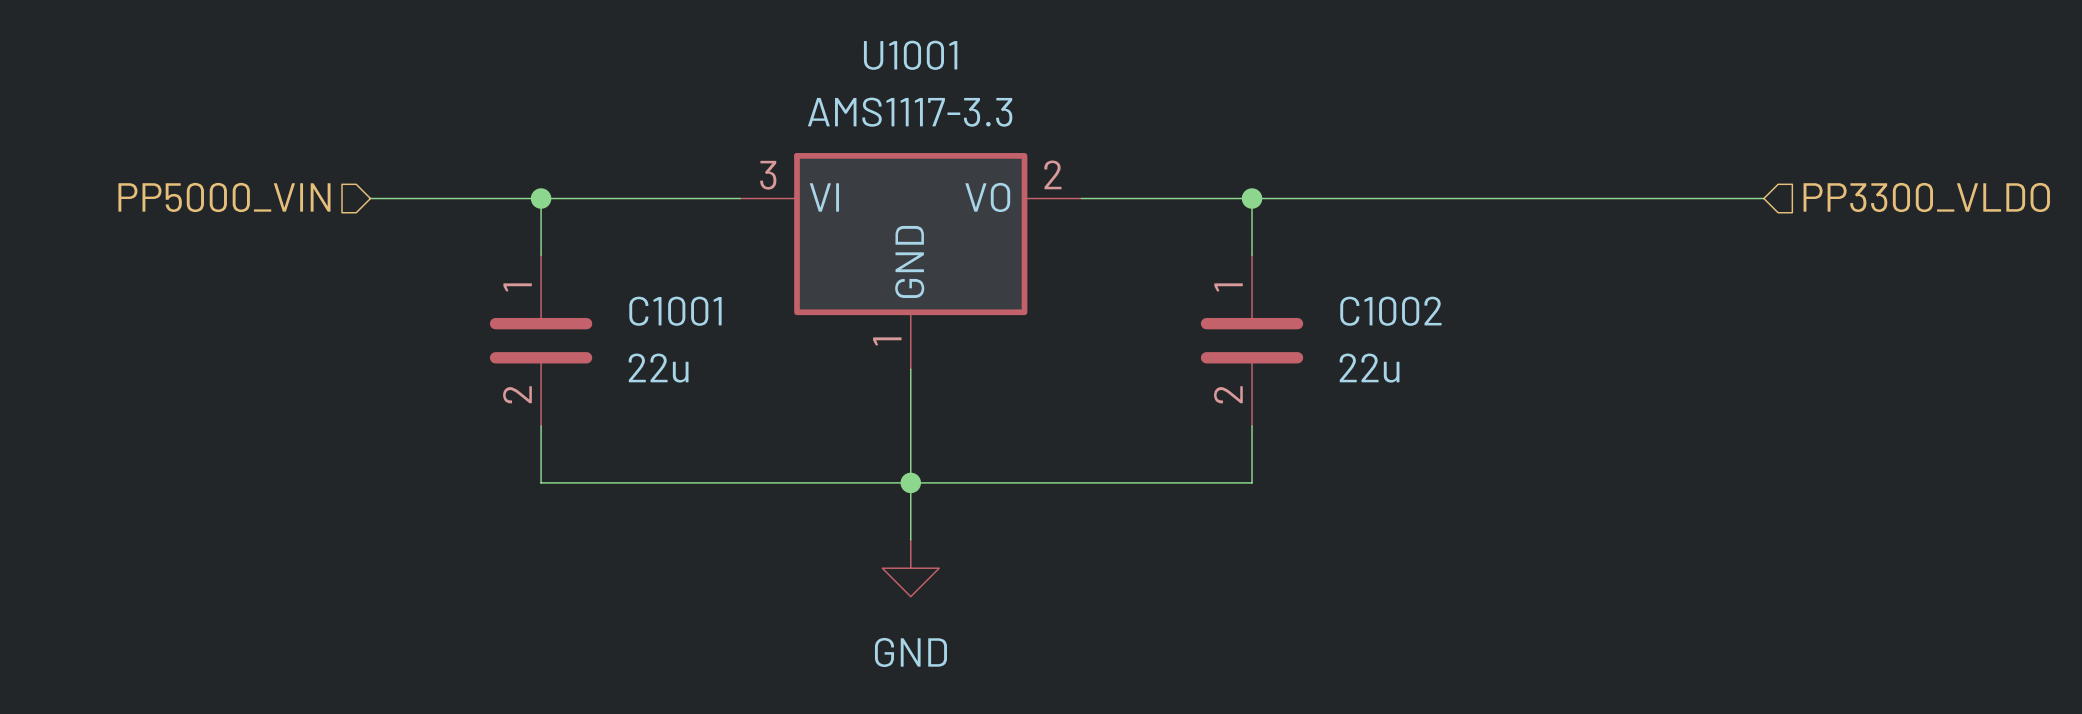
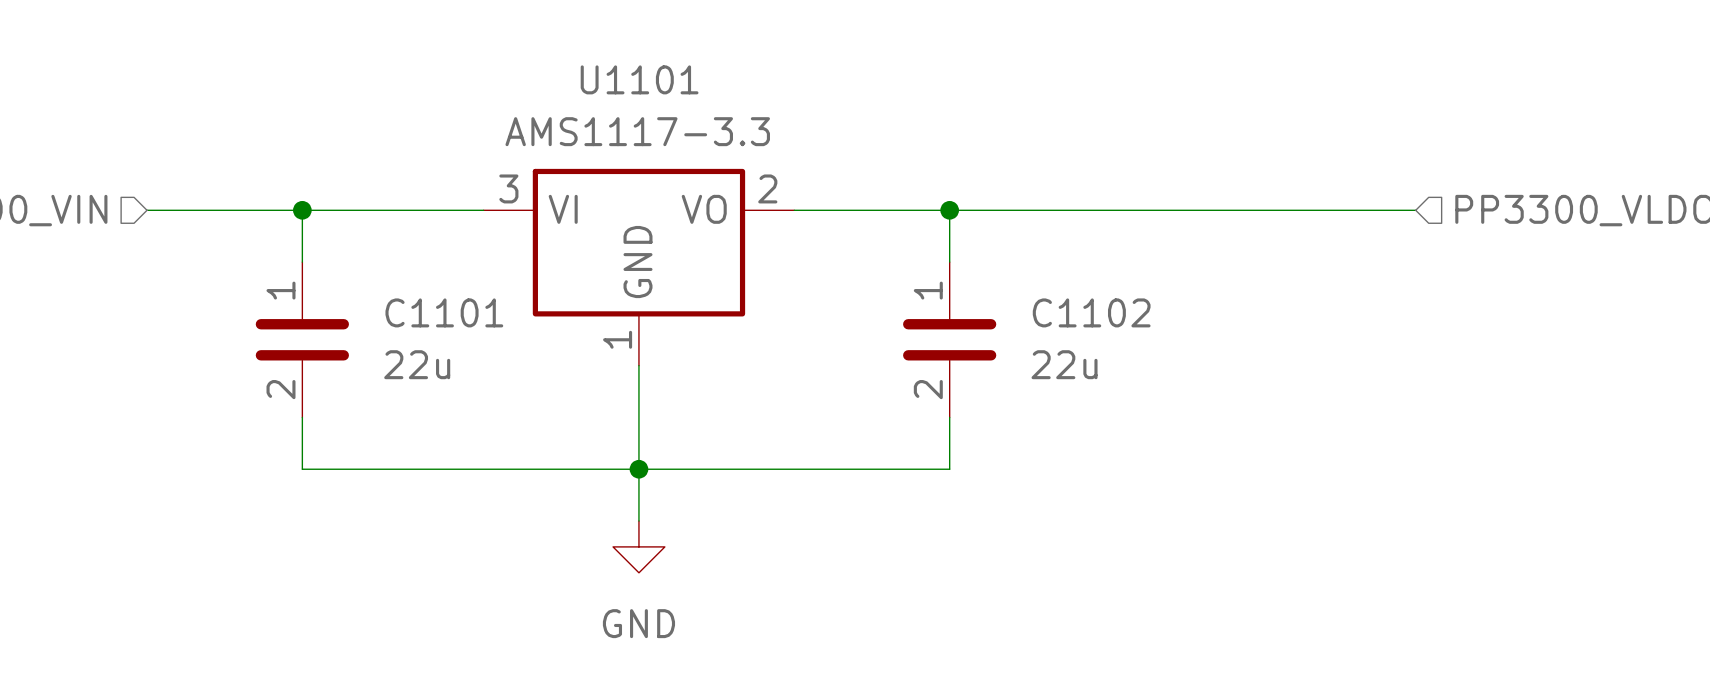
U1001 name: U1001 (910, 55) -> U1101 (639, 79)
C1001 name: C1001 (675, 311) -> C1101 (444, 312)
C1002 name: C1002 (1390, 311) -> C1102 (1091, 312)

